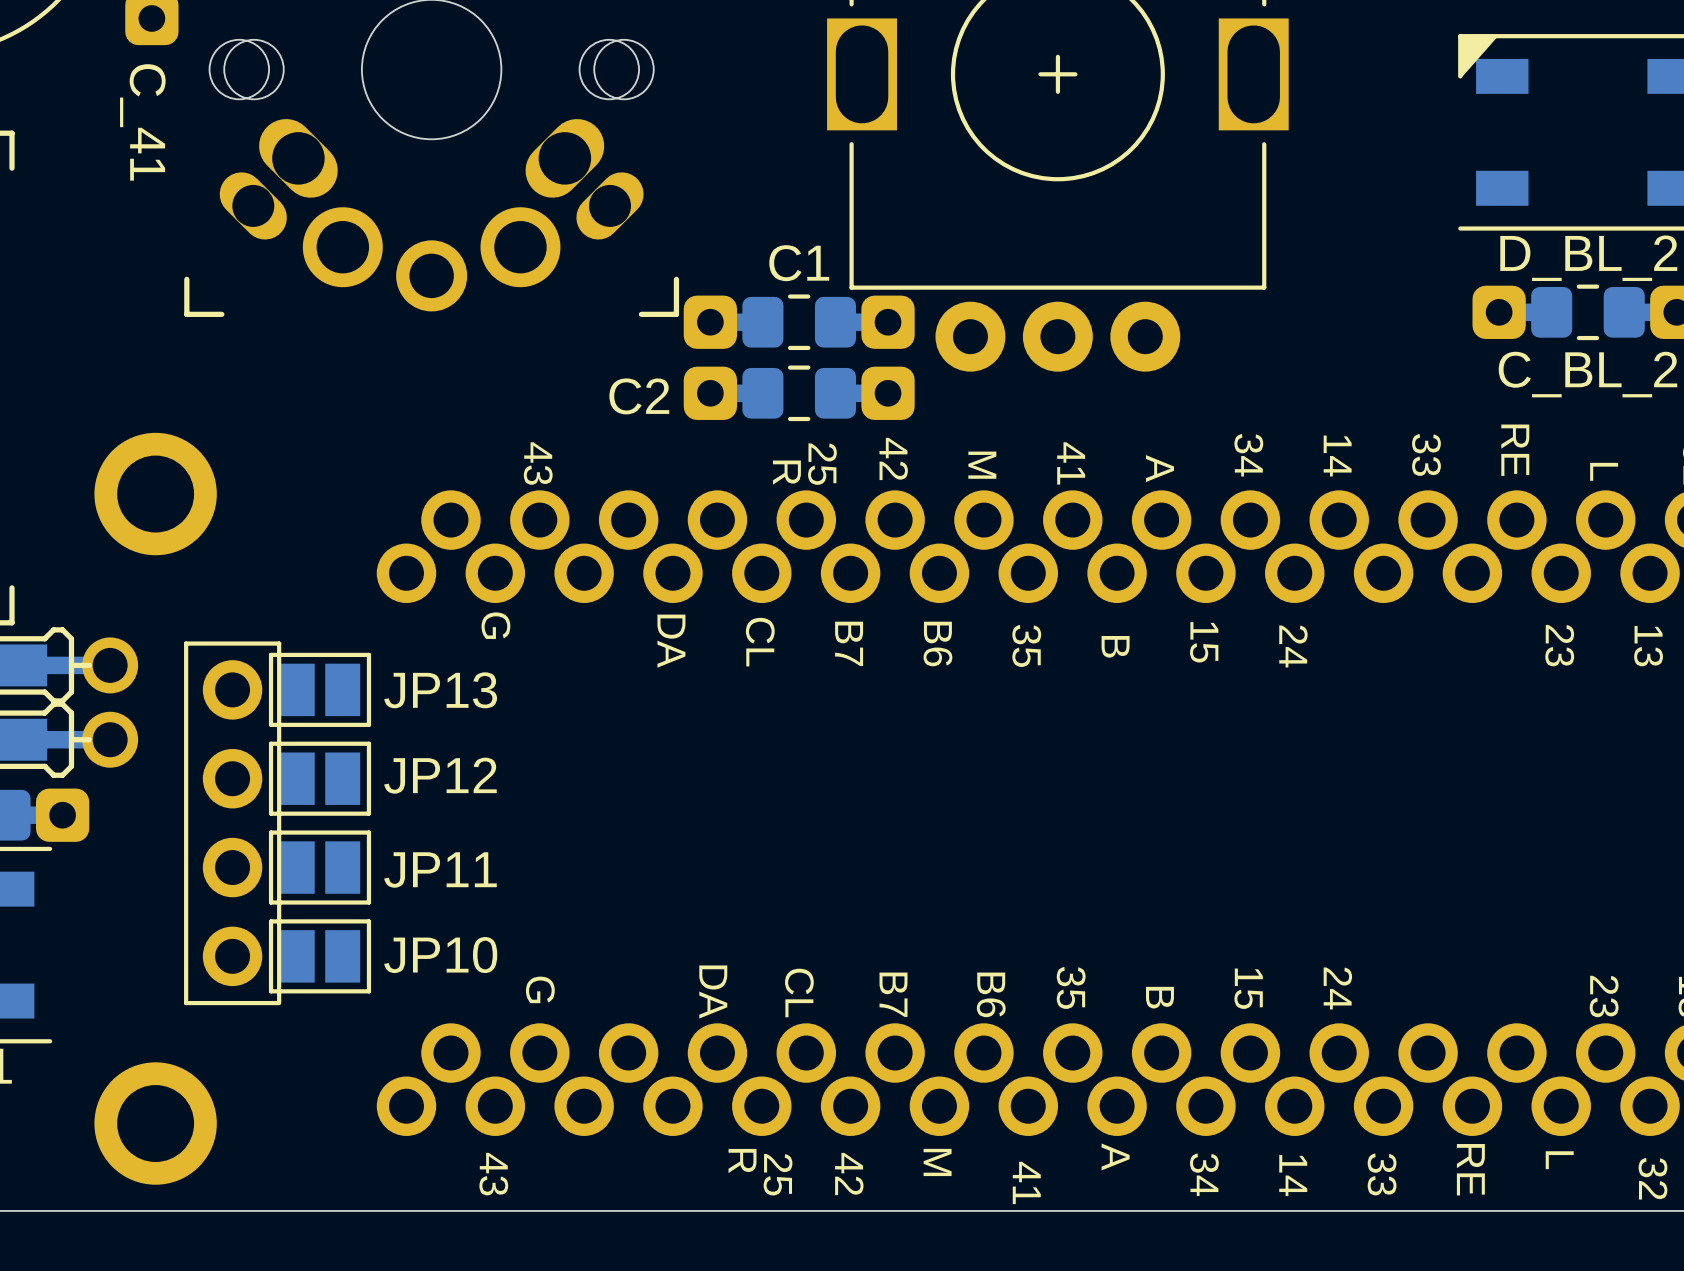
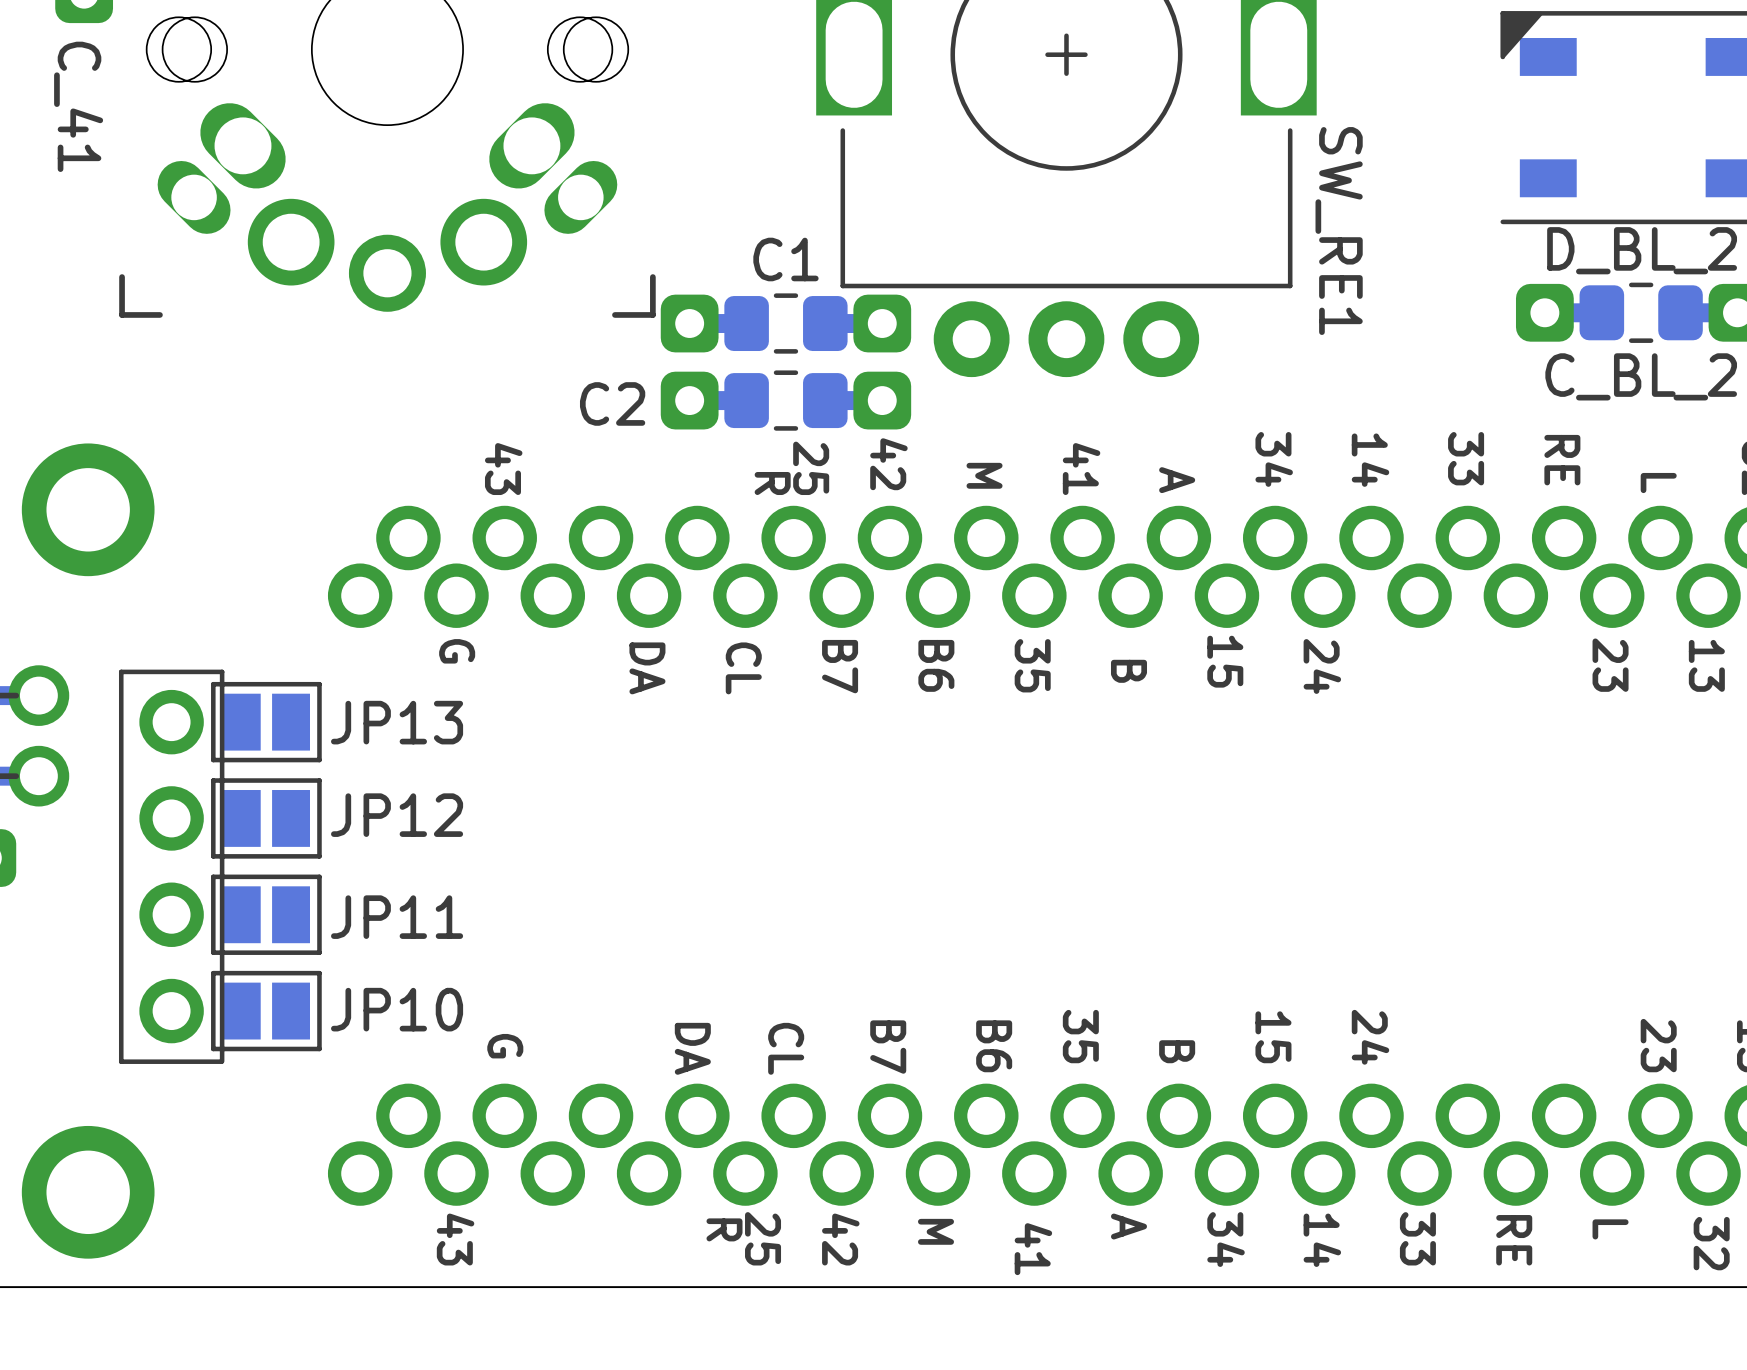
SW_RE1 name: none -> SW_RE1 (1339, 231)

